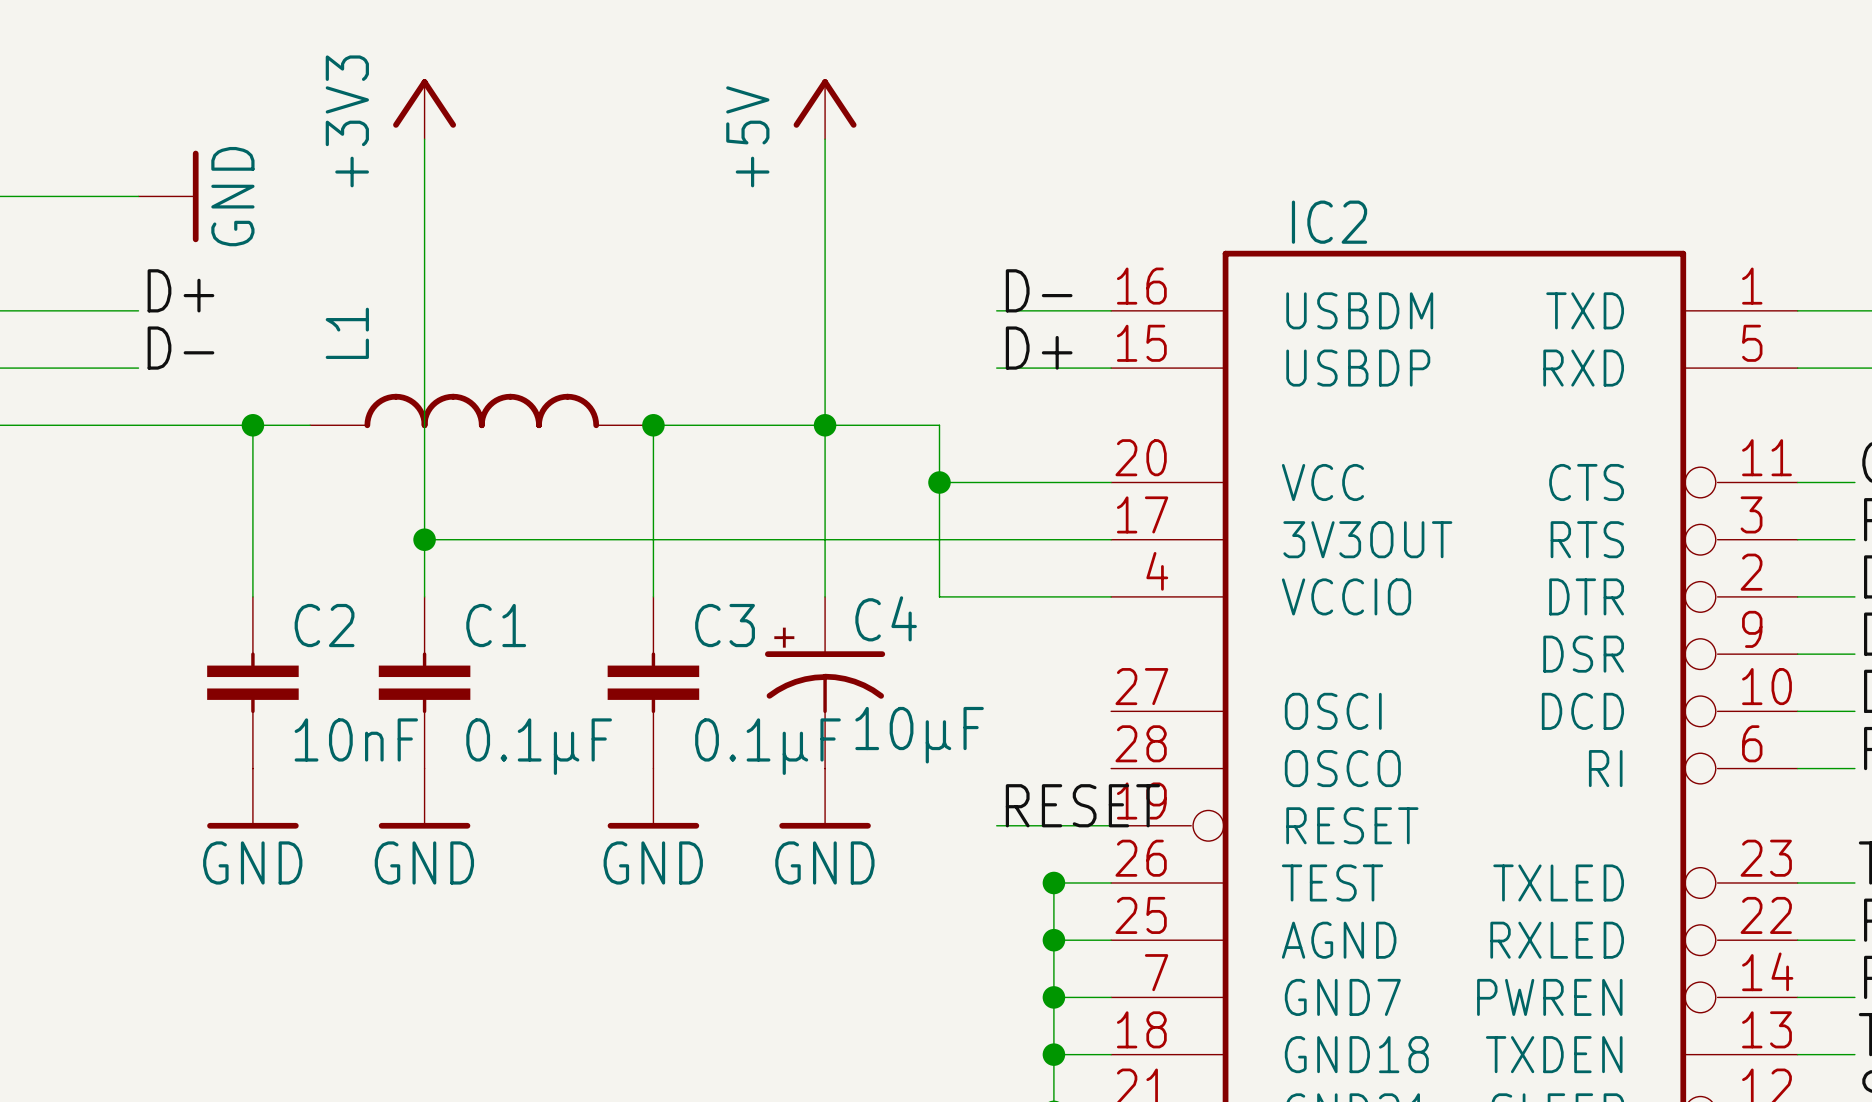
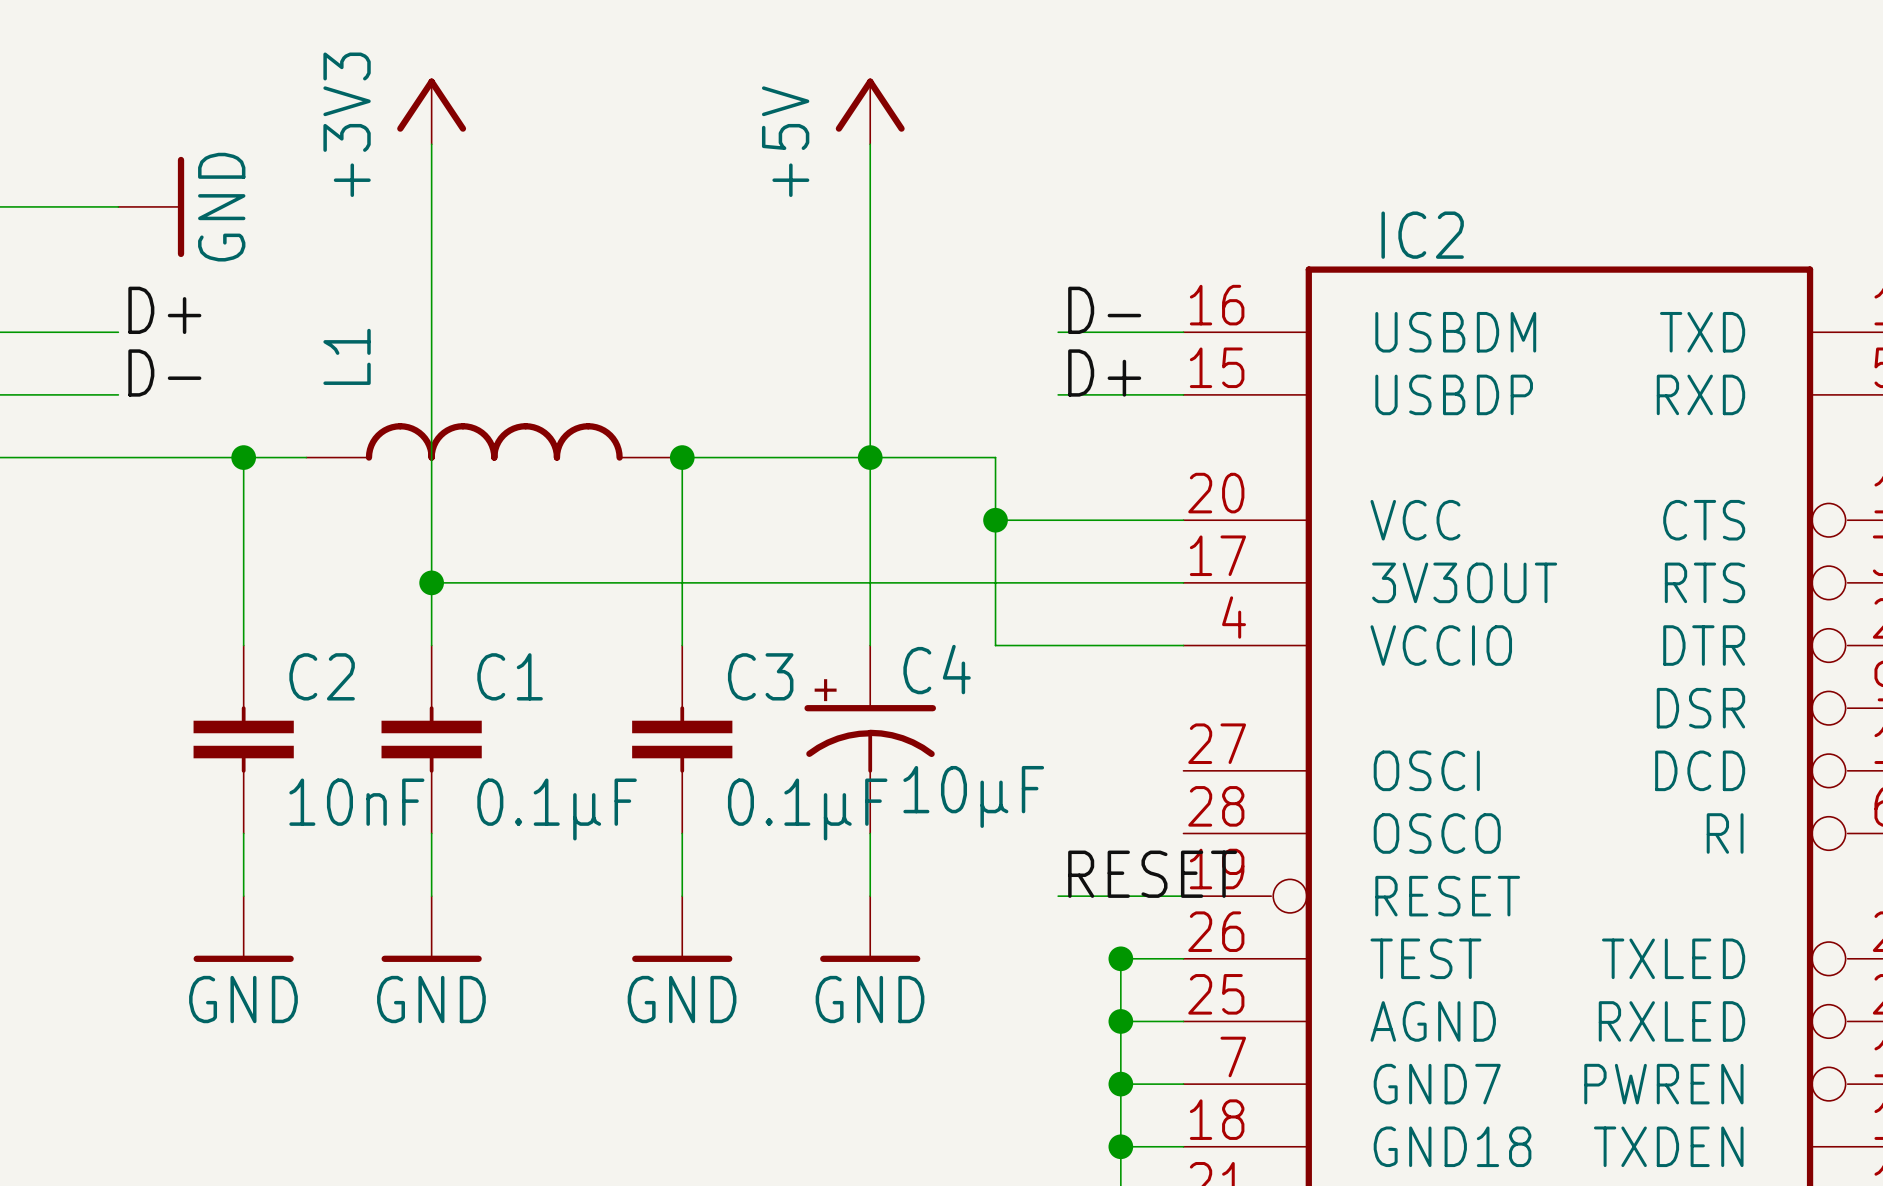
power symbol position: GND (252, 798) -> GND (243, 929)
power symbol position: GND (424, 798) -> GND (431, 929)
power symbol position: GND (653, 798) -> GND (682, 929)
power symbol position: GND (825, 798) -> GND (870, 929)

